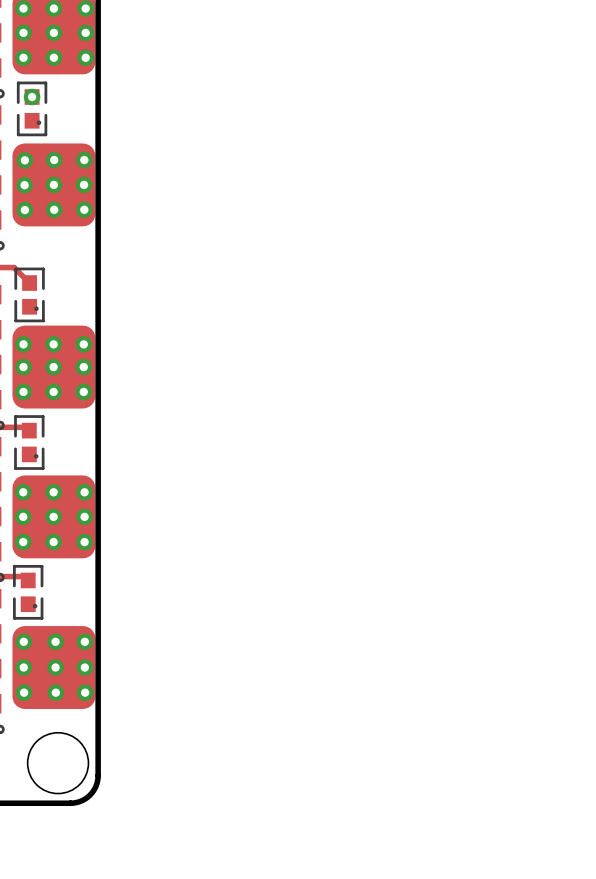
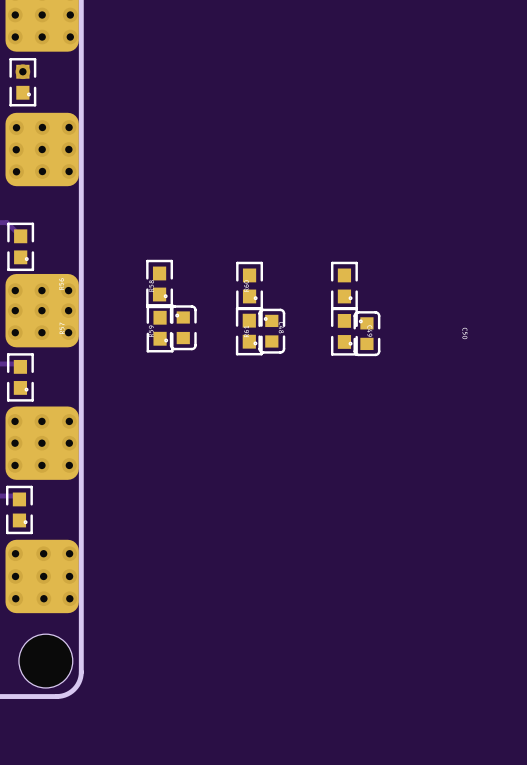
part: none -> (159, 283)
part: none -> (249, 285)
part: none -> (344, 285)
part: none -> (160, 328)
part: none -> (183, 327)
part: none -> (249, 331)
part: none -> (271, 331)
part: none -> (344, 331)
part: none -> (366, 333)

